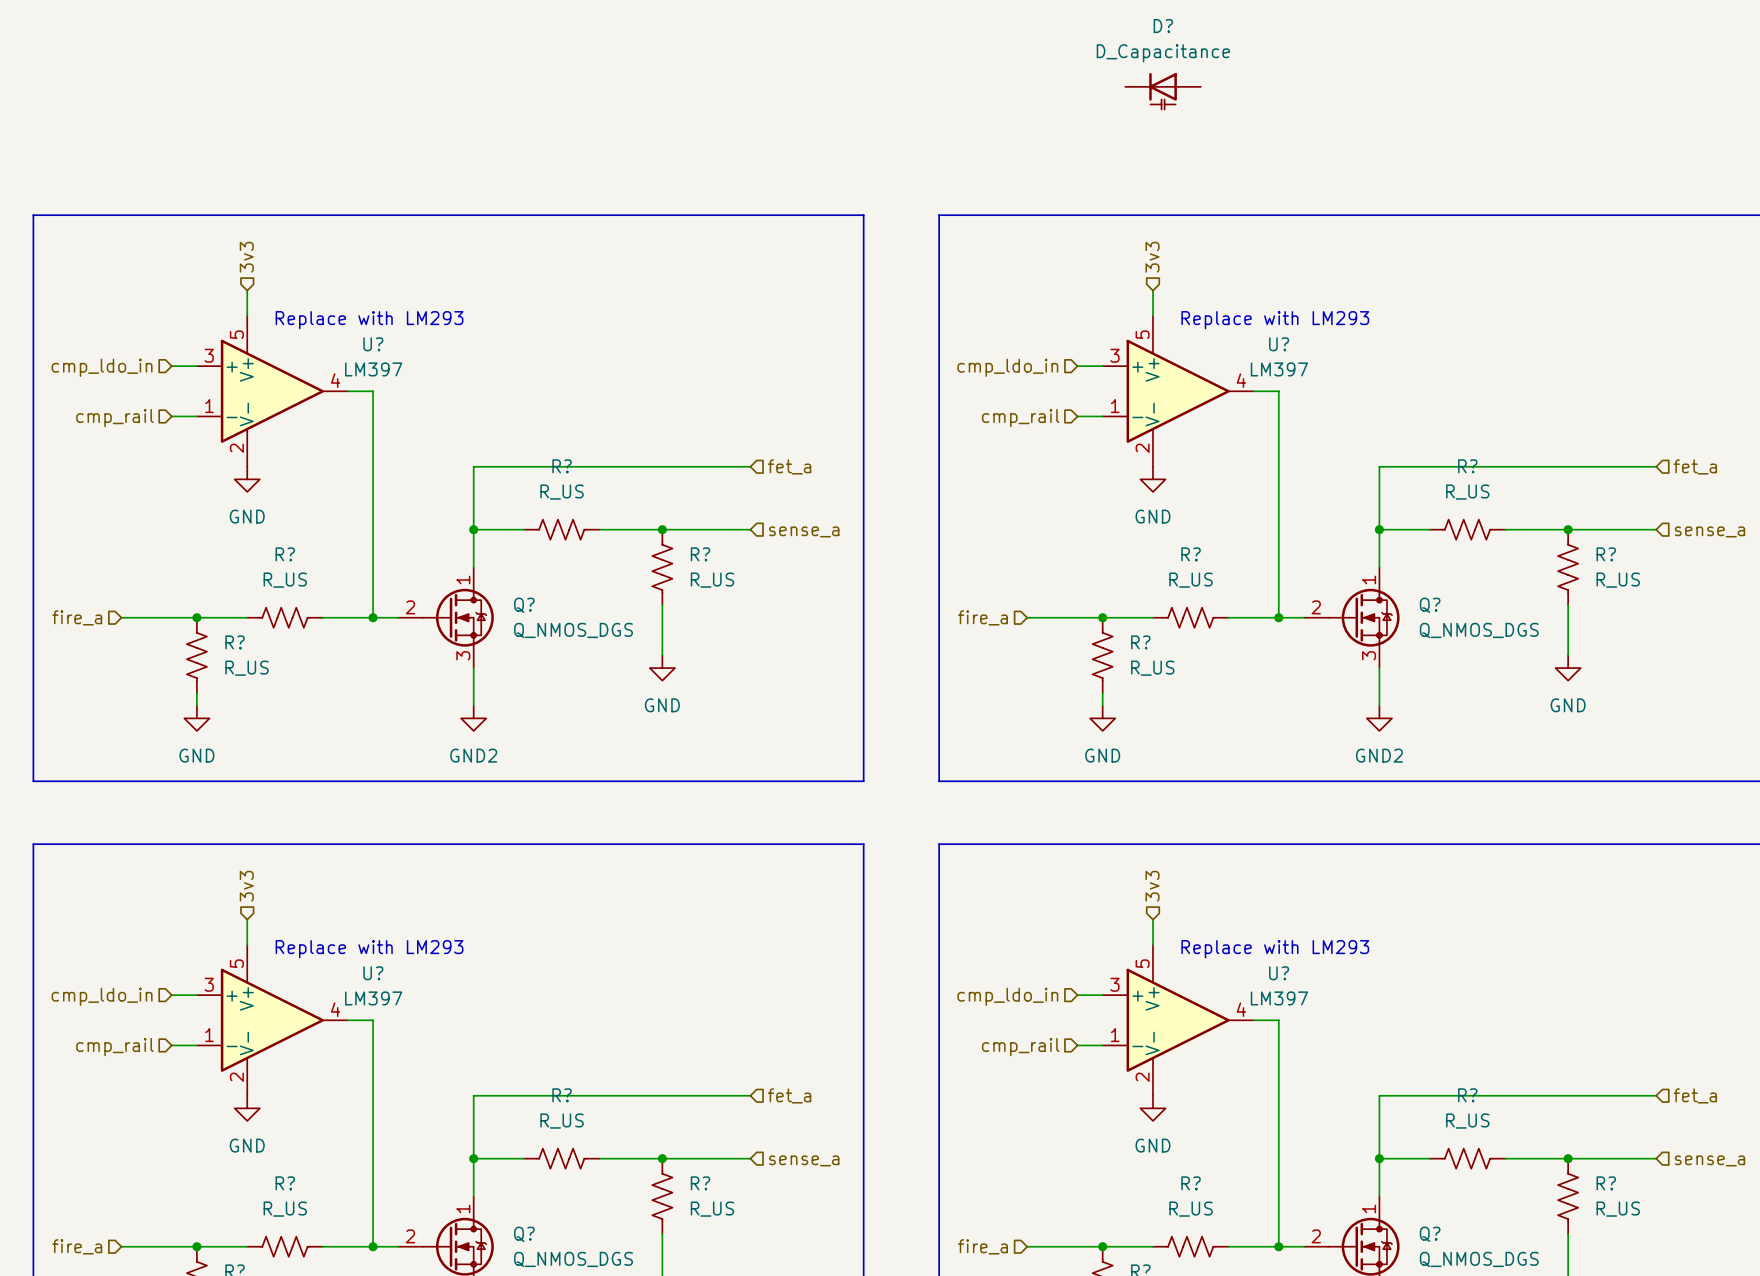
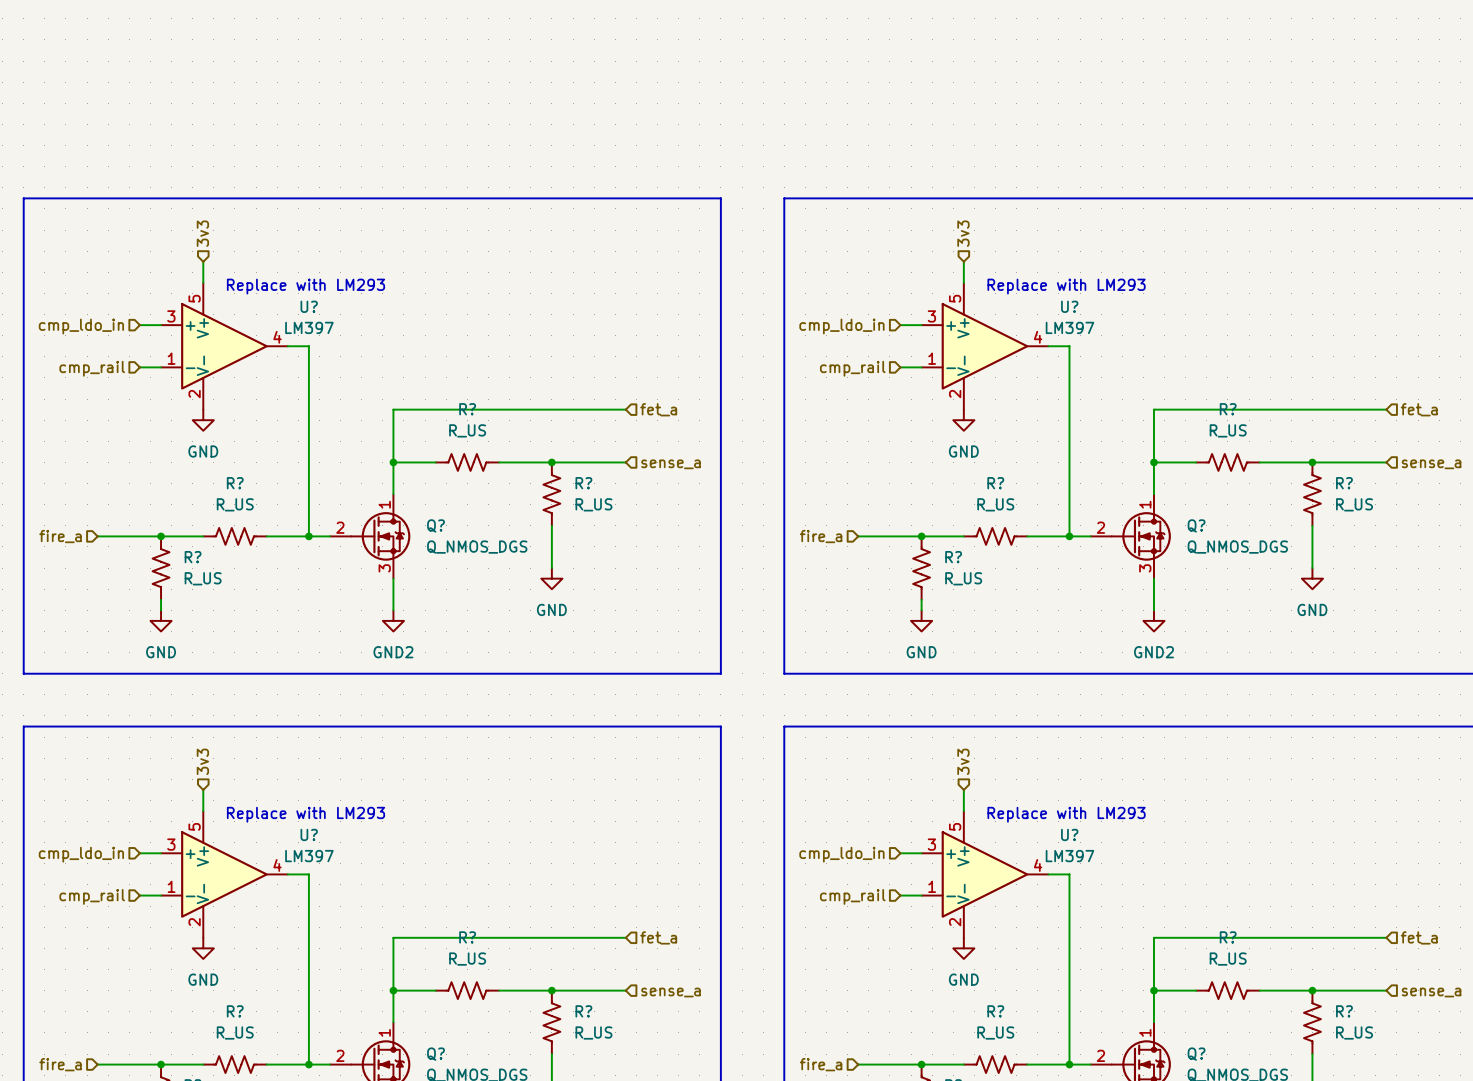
D?: D_Capacitance (1163, 91) -> none

